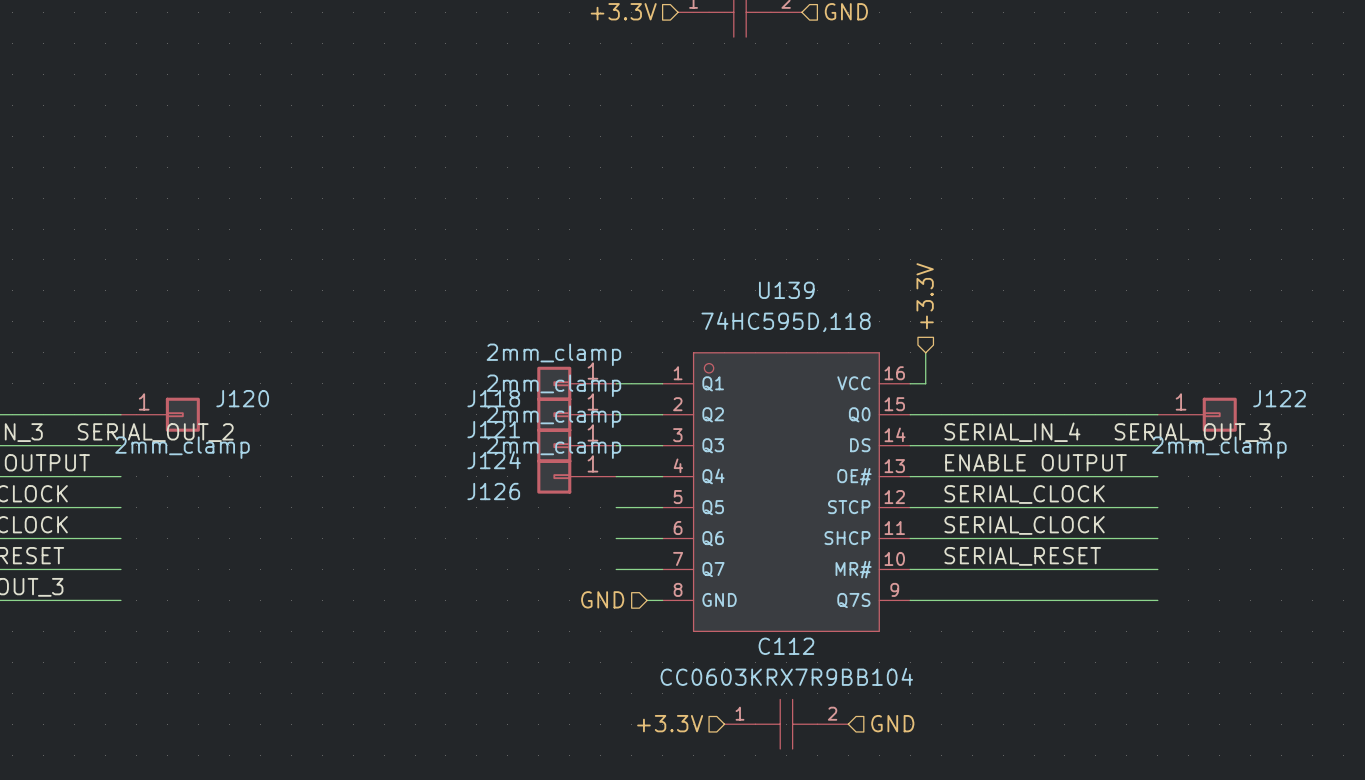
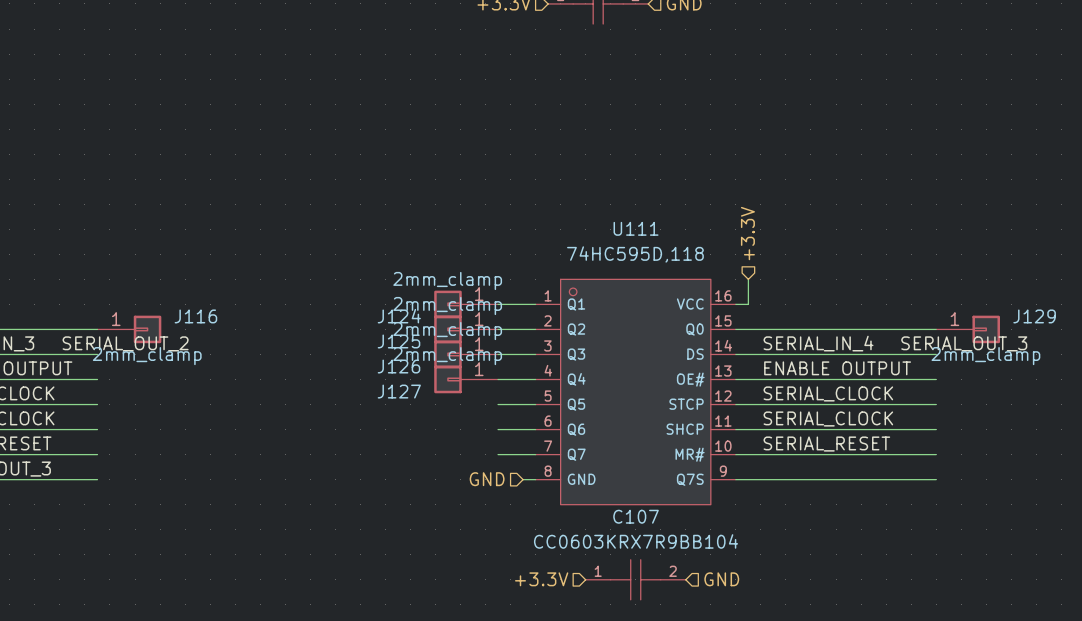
U139 name: U139 (786, 290) -> U111 (636, 228)
J120 name: J120 (242, 398) -> J116 (195, 316)
J118 name: J118 (493, 398) -> J124 (399, 316)
J122 name: J122 (1279, 398) -> J129 (1034, 316)
J121 name: J121 (493, 429) -> J125 (399, 341)
J124 name: J124 (494, 460) -> J126 (399, 366)
J126 name: J126 (493, 491) -> J127 (399, 391)
C112 name: C112 (786, 646) -> C107 (636, 516)

